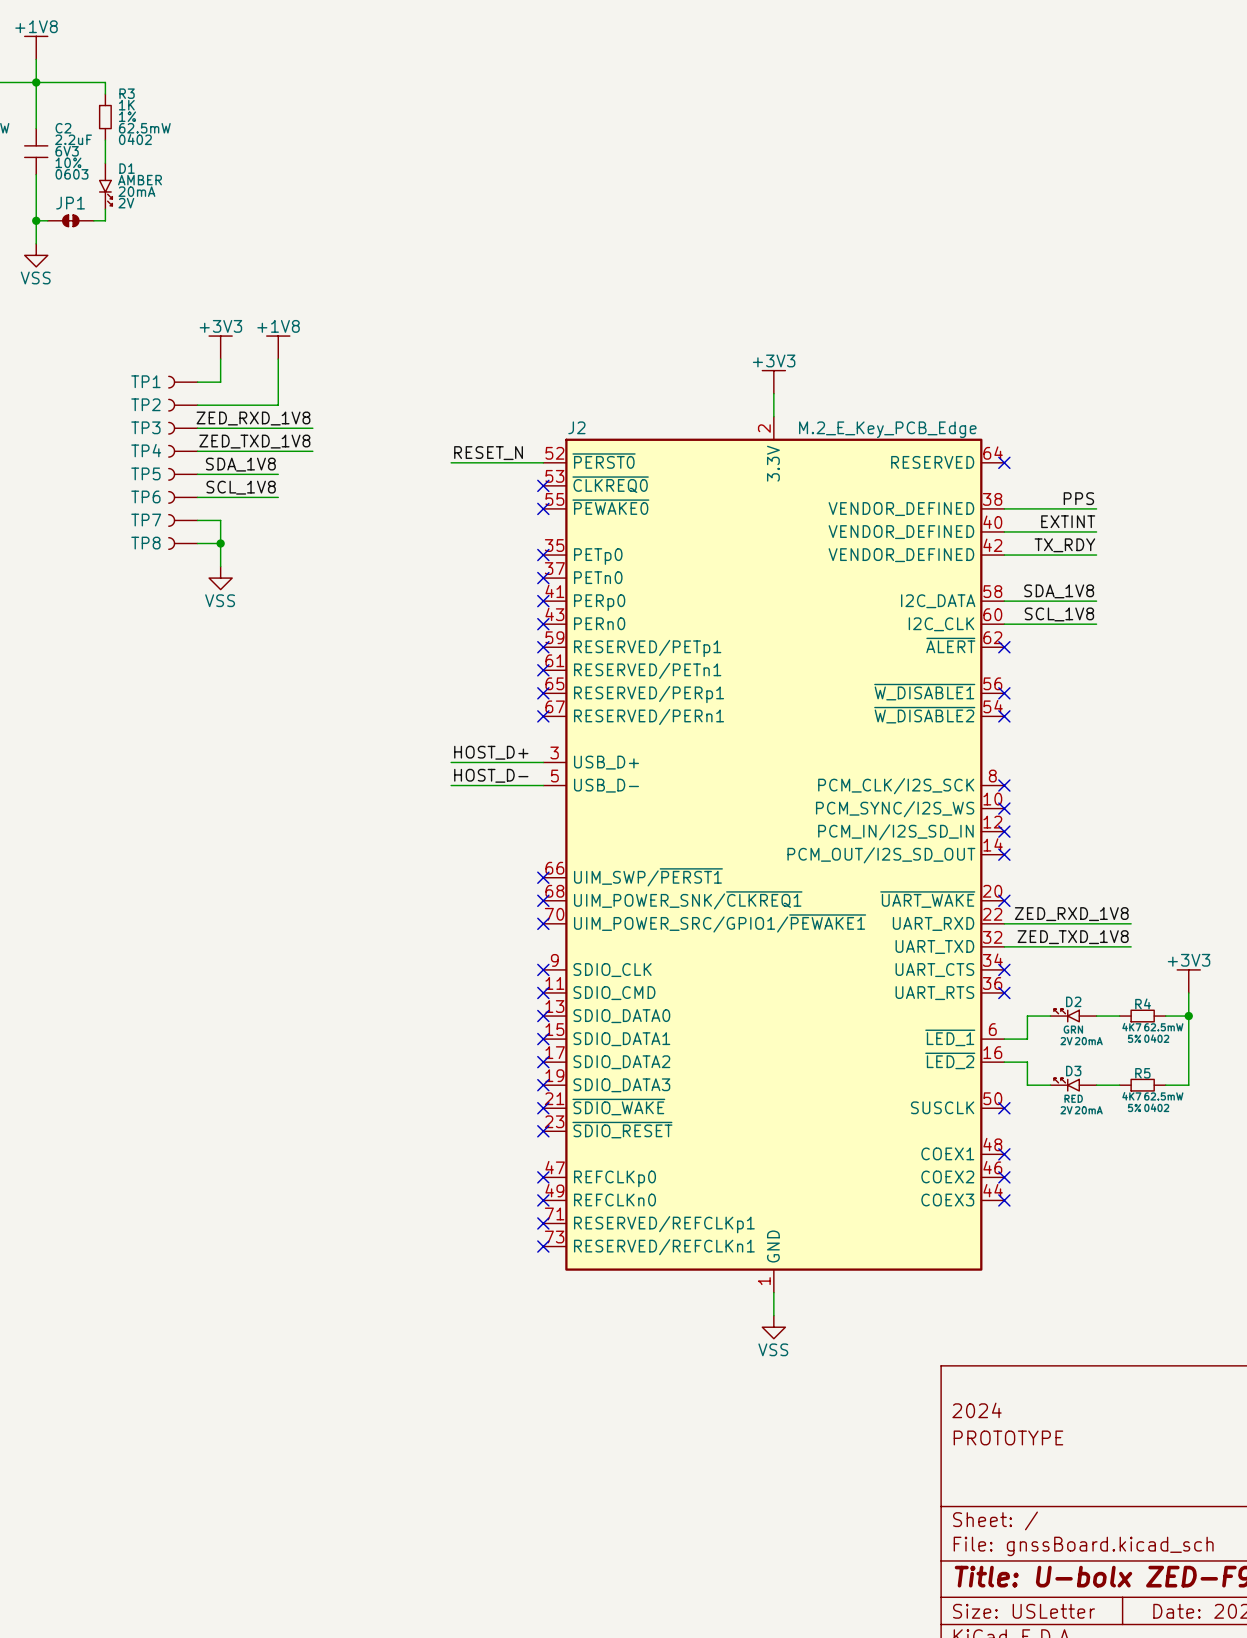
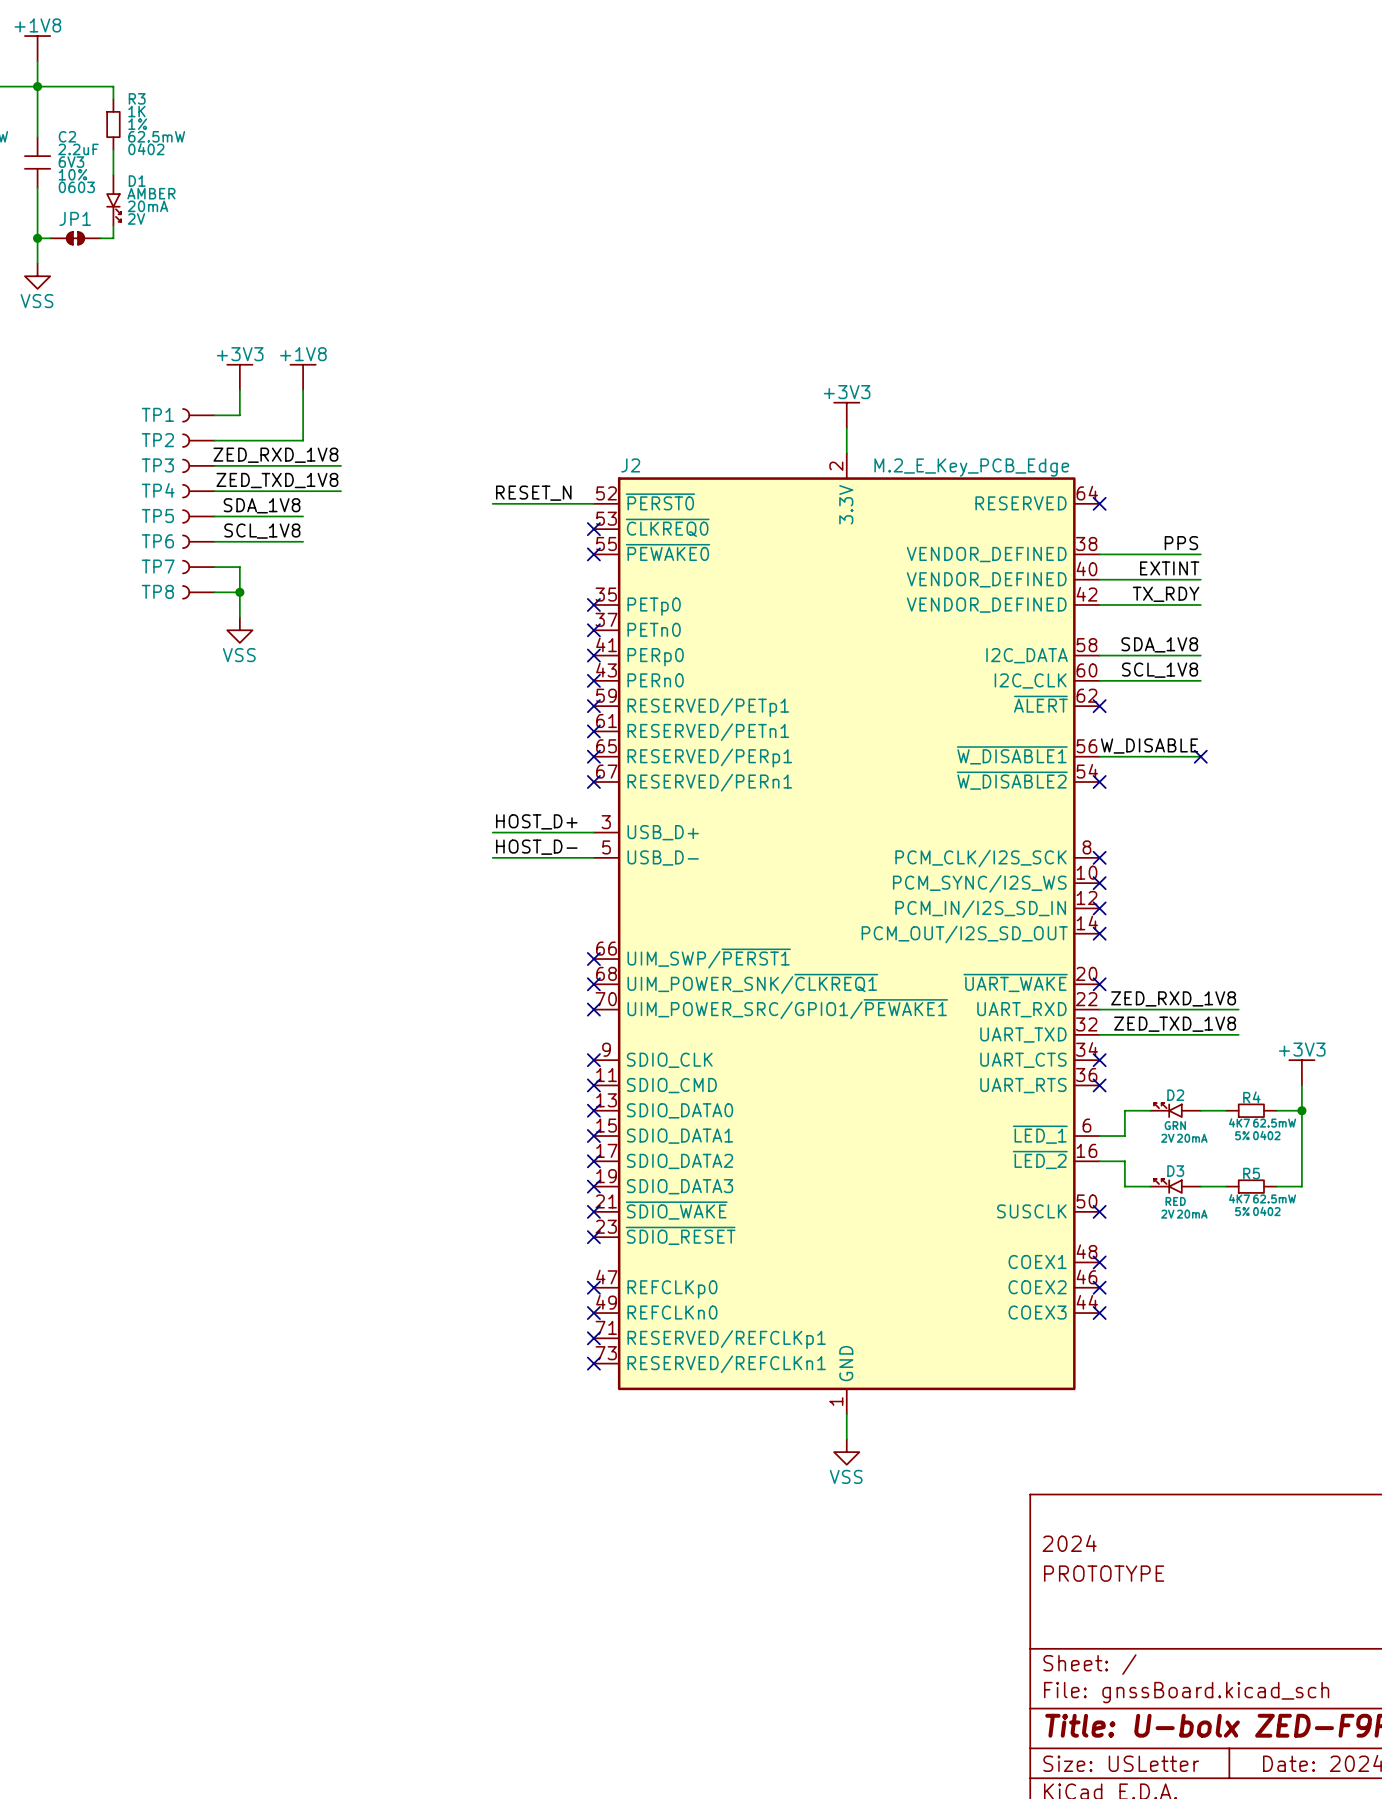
label: none -> W_DISABLE (1149, 746)
wire: none -> (1099, 756) (1200, 756)
no-connect mark: (1004, 693) -> none
no-connect mark: none -> (1200, 756)

